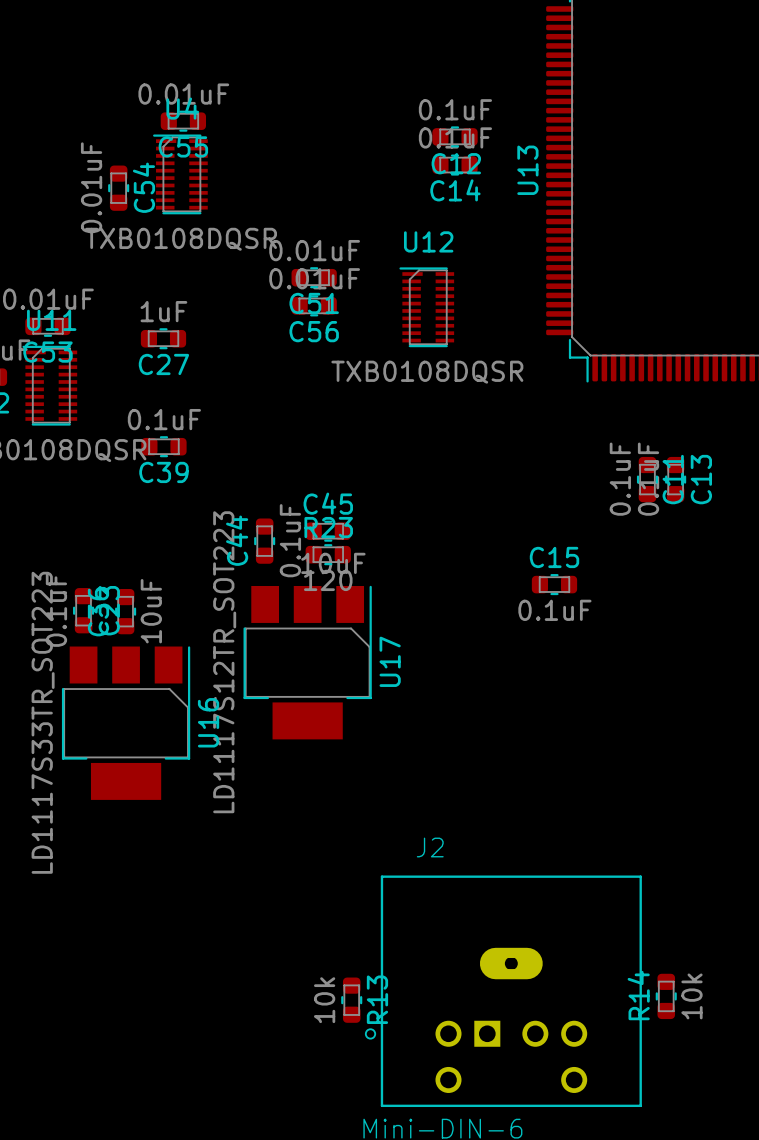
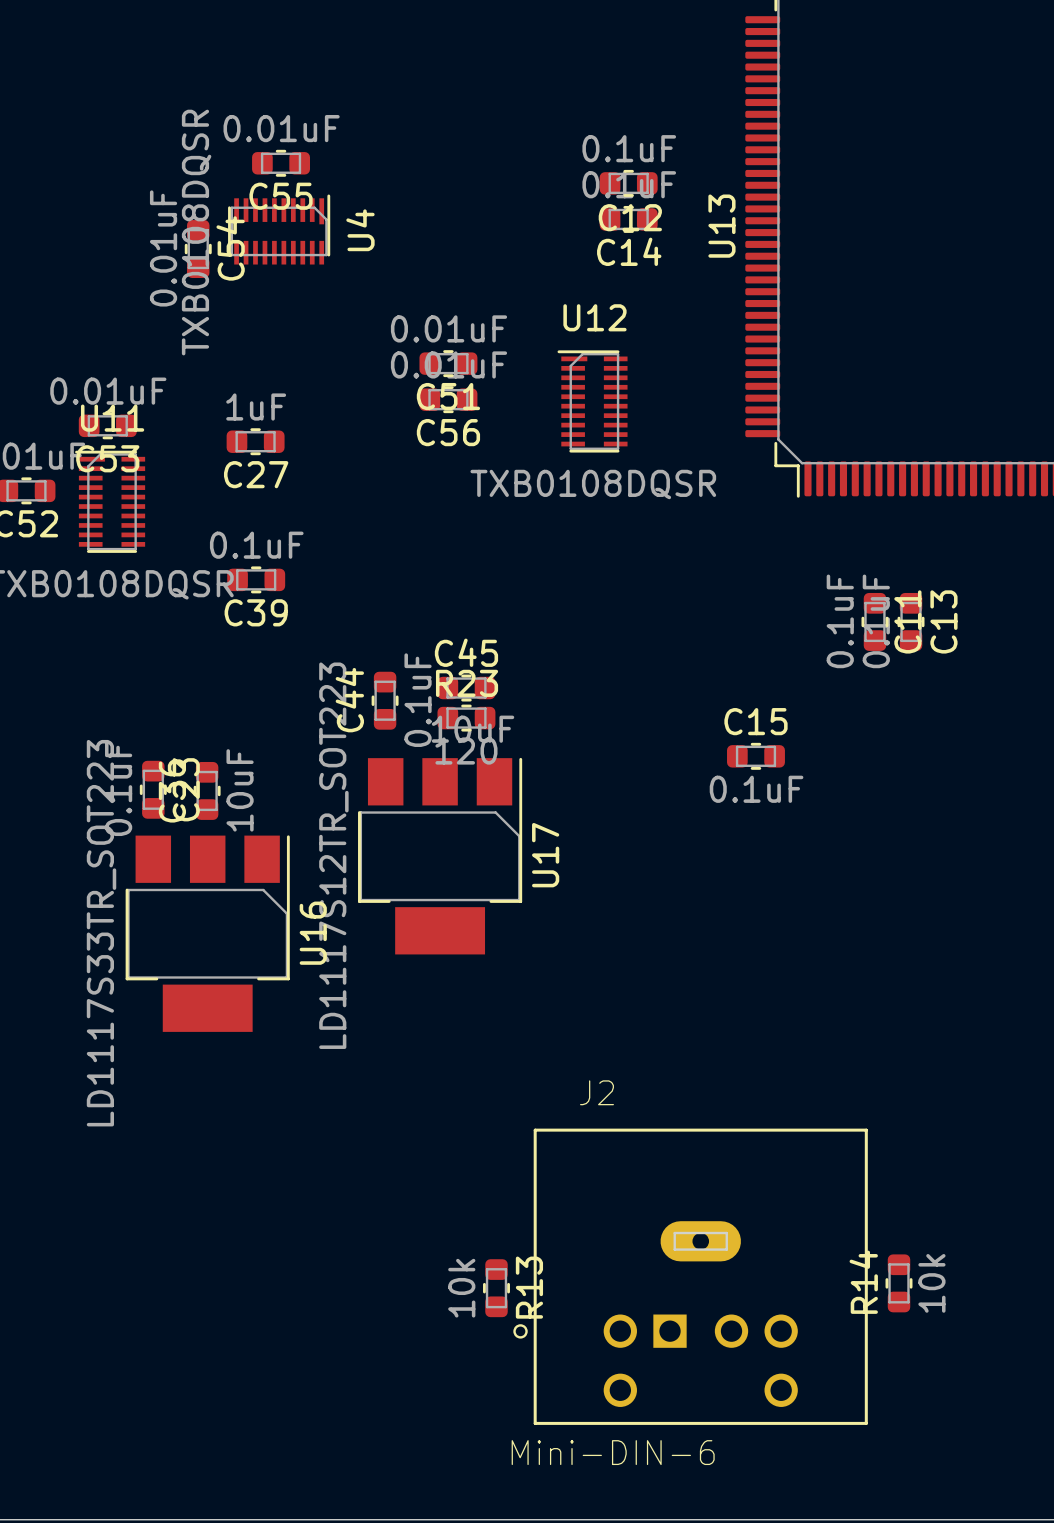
U4 rotation: 0° (180, 174) -> 90° clockwise (279, 229)

